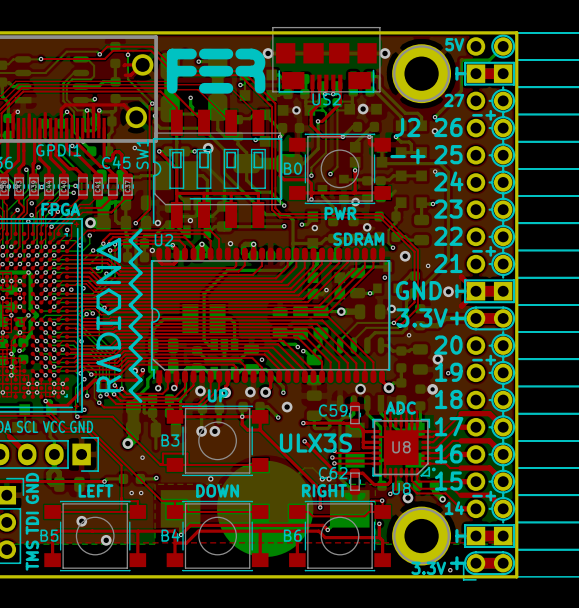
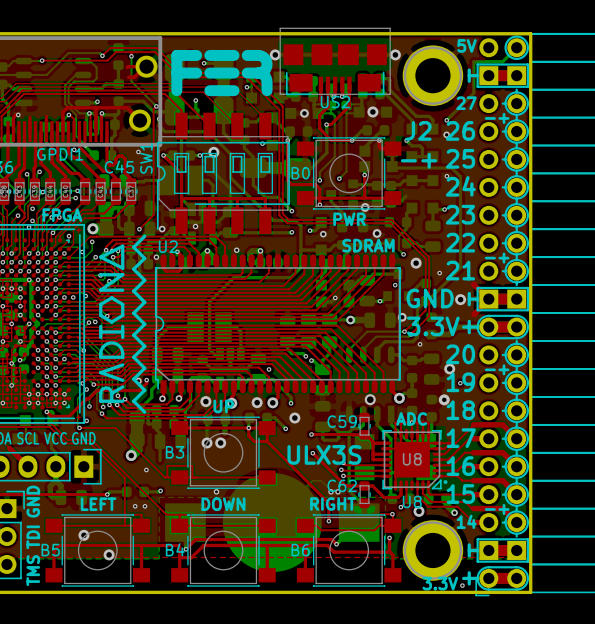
via: (11, 366) -> none
via: none -> (46, 394)

